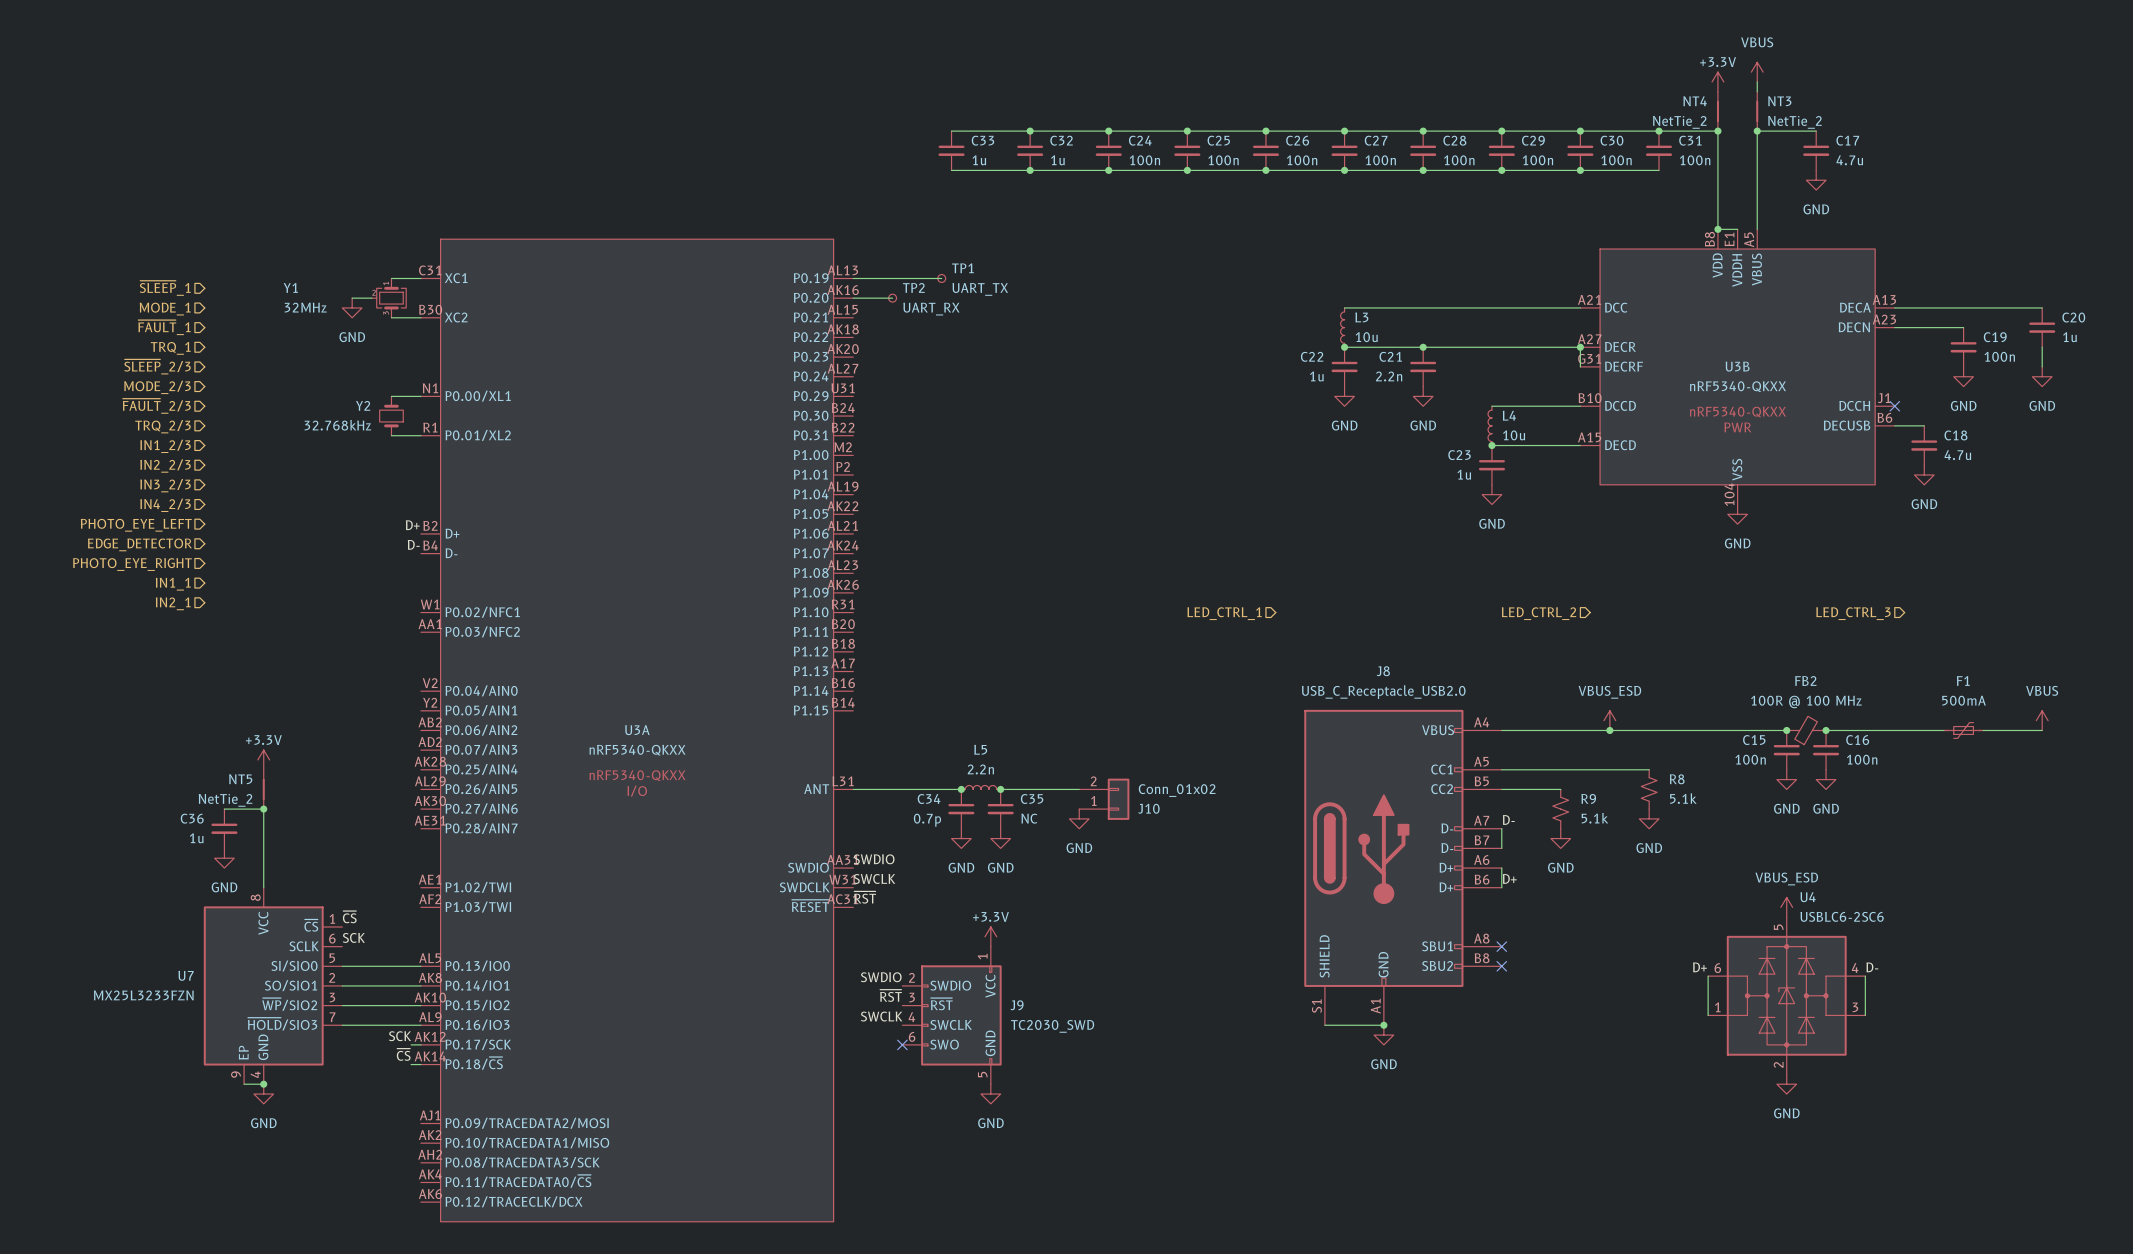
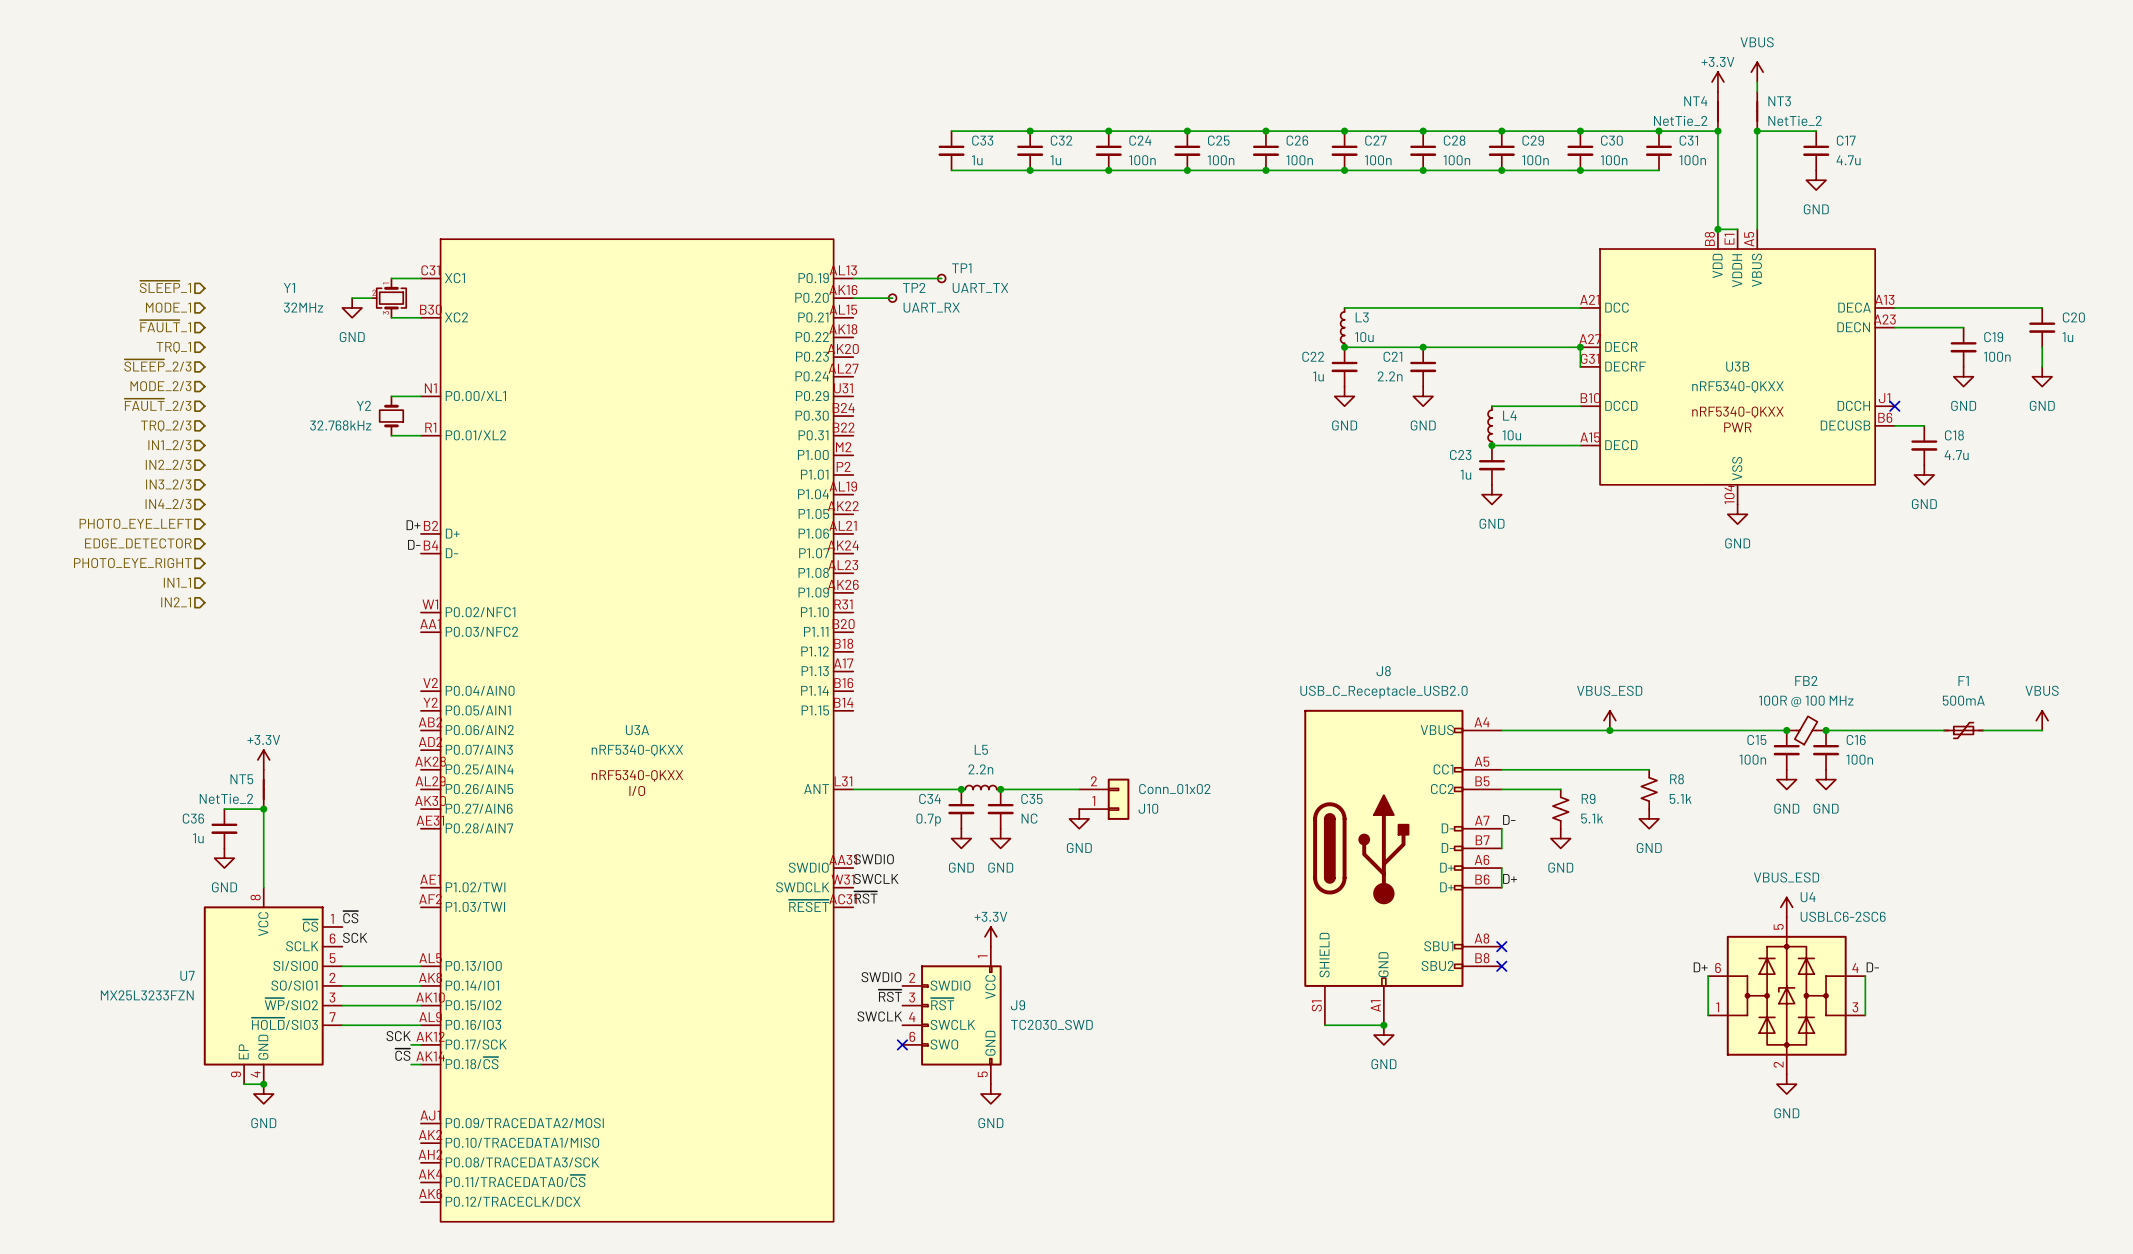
hierarchical label: LED_CTRL_1 (1224, 613) -> none
hierarchical label: LED_CTRL_2 (1539, 613) -> none
hierarchical label: LED_CTRL_3 (1853, 613) -> none

